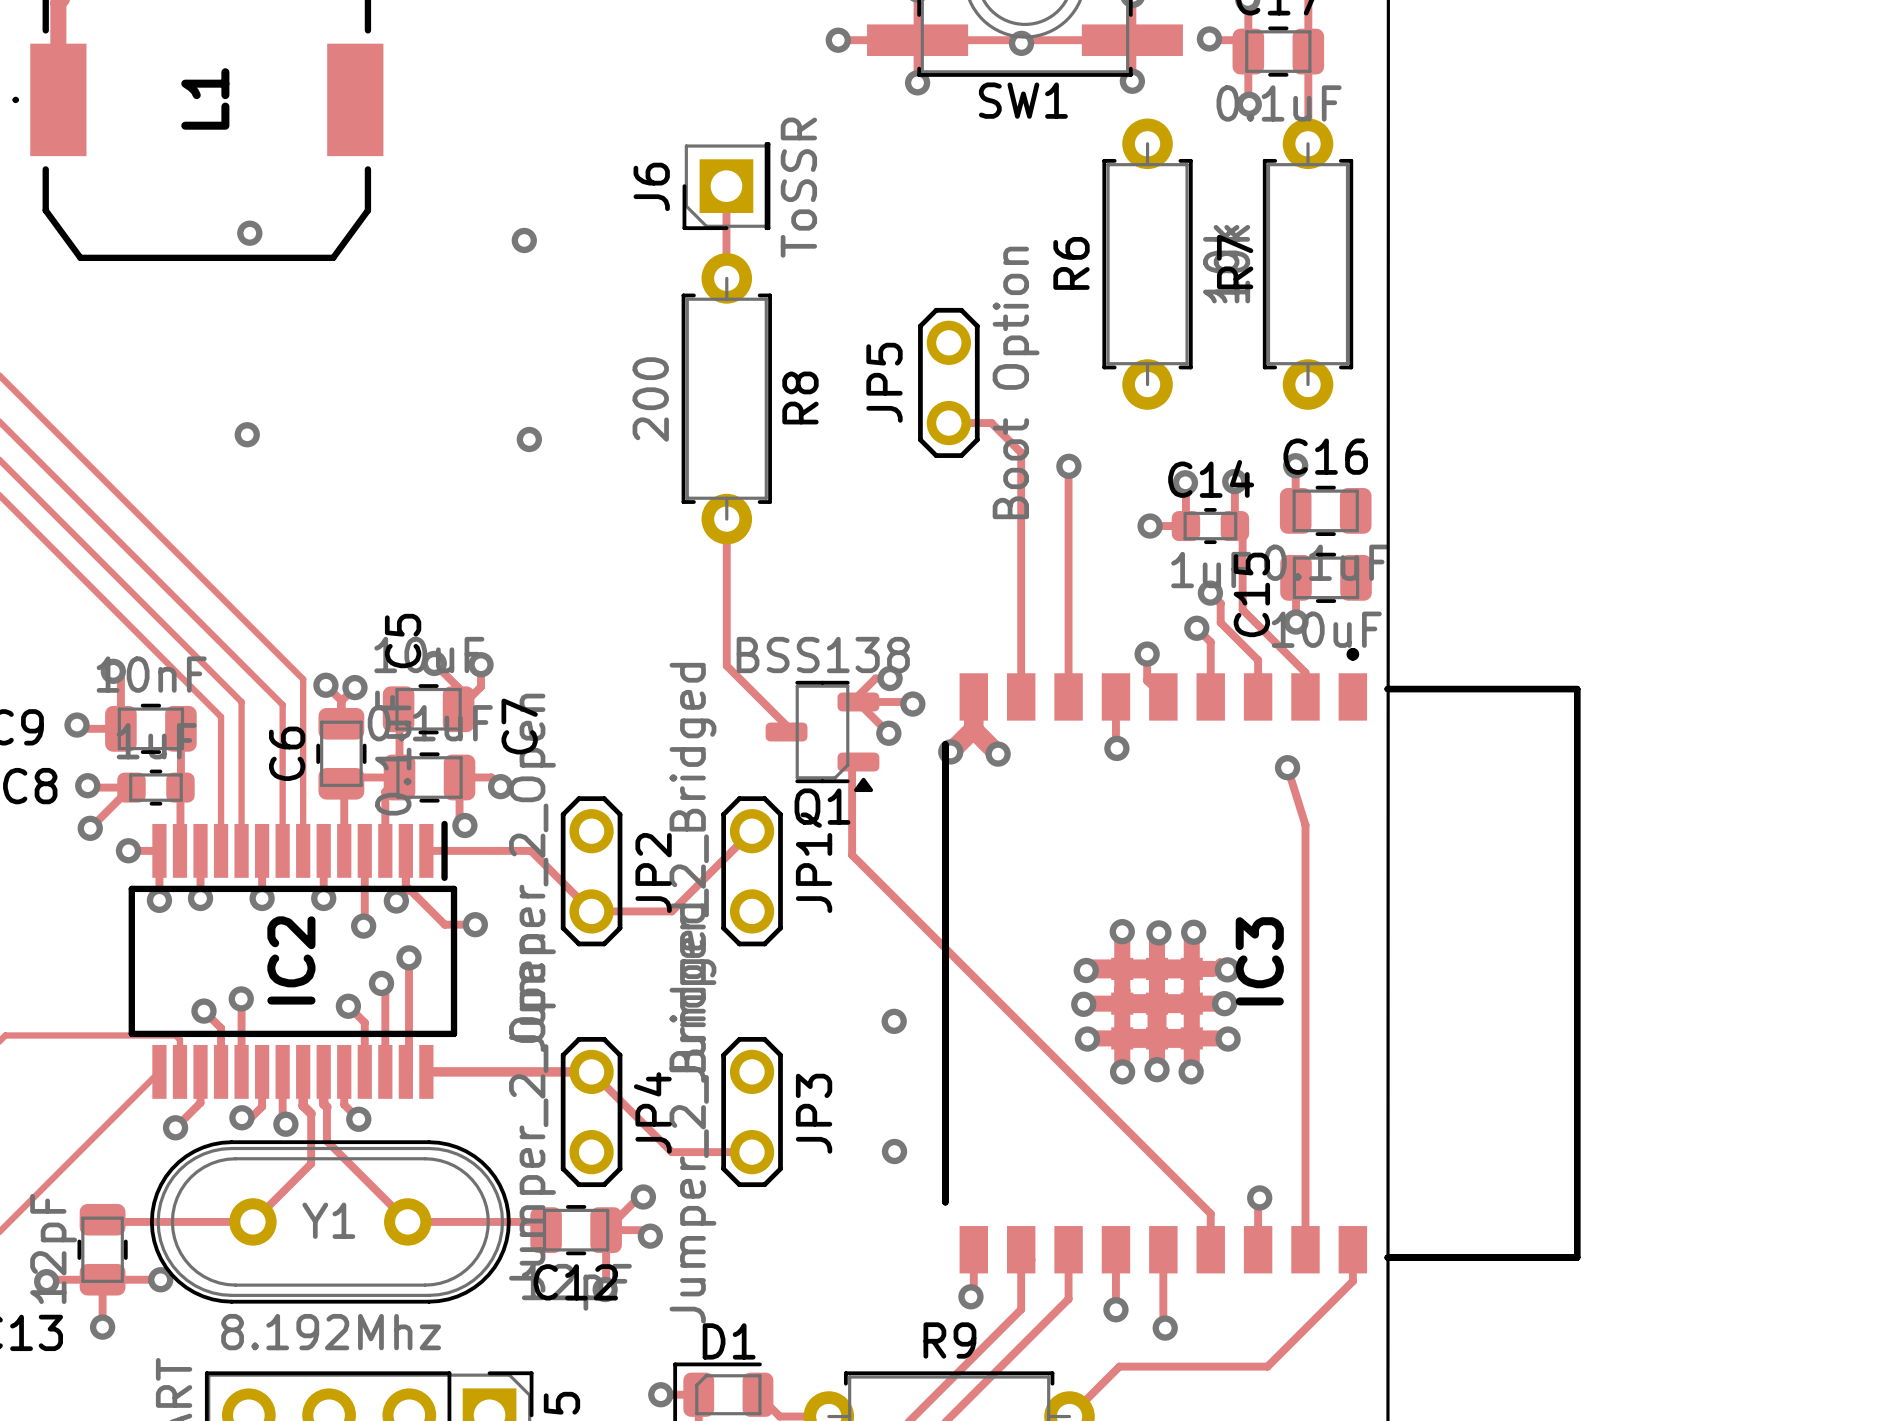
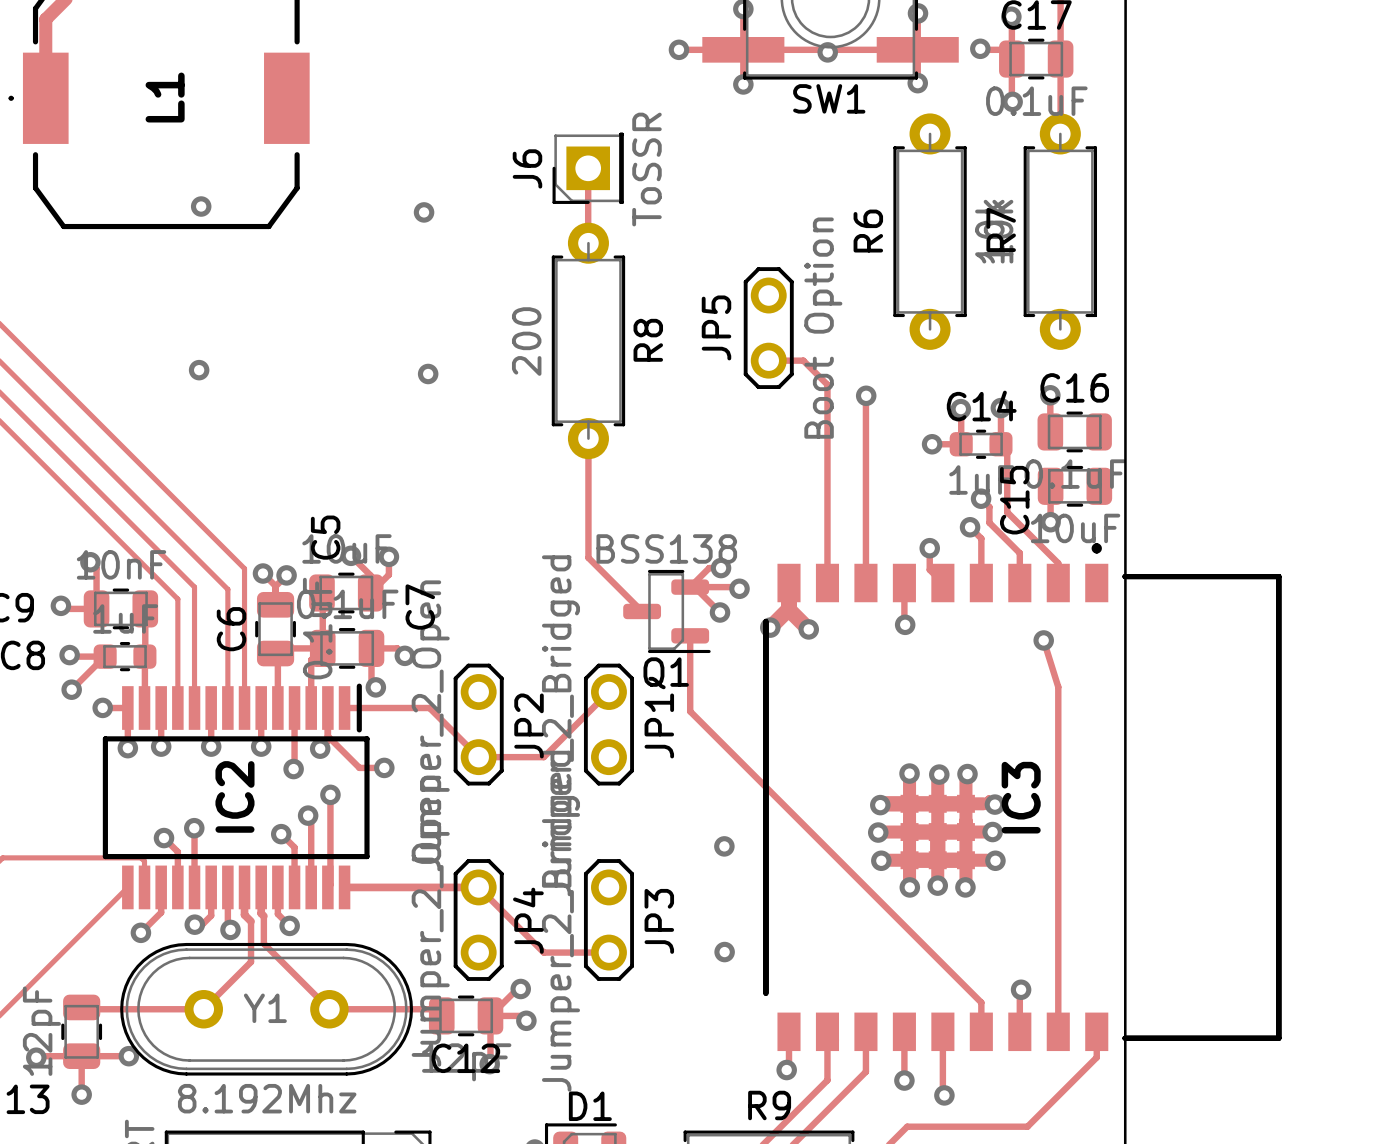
Q1 footprint: [765, 680, 880, 793] -> [623, 569, 711, 654]

